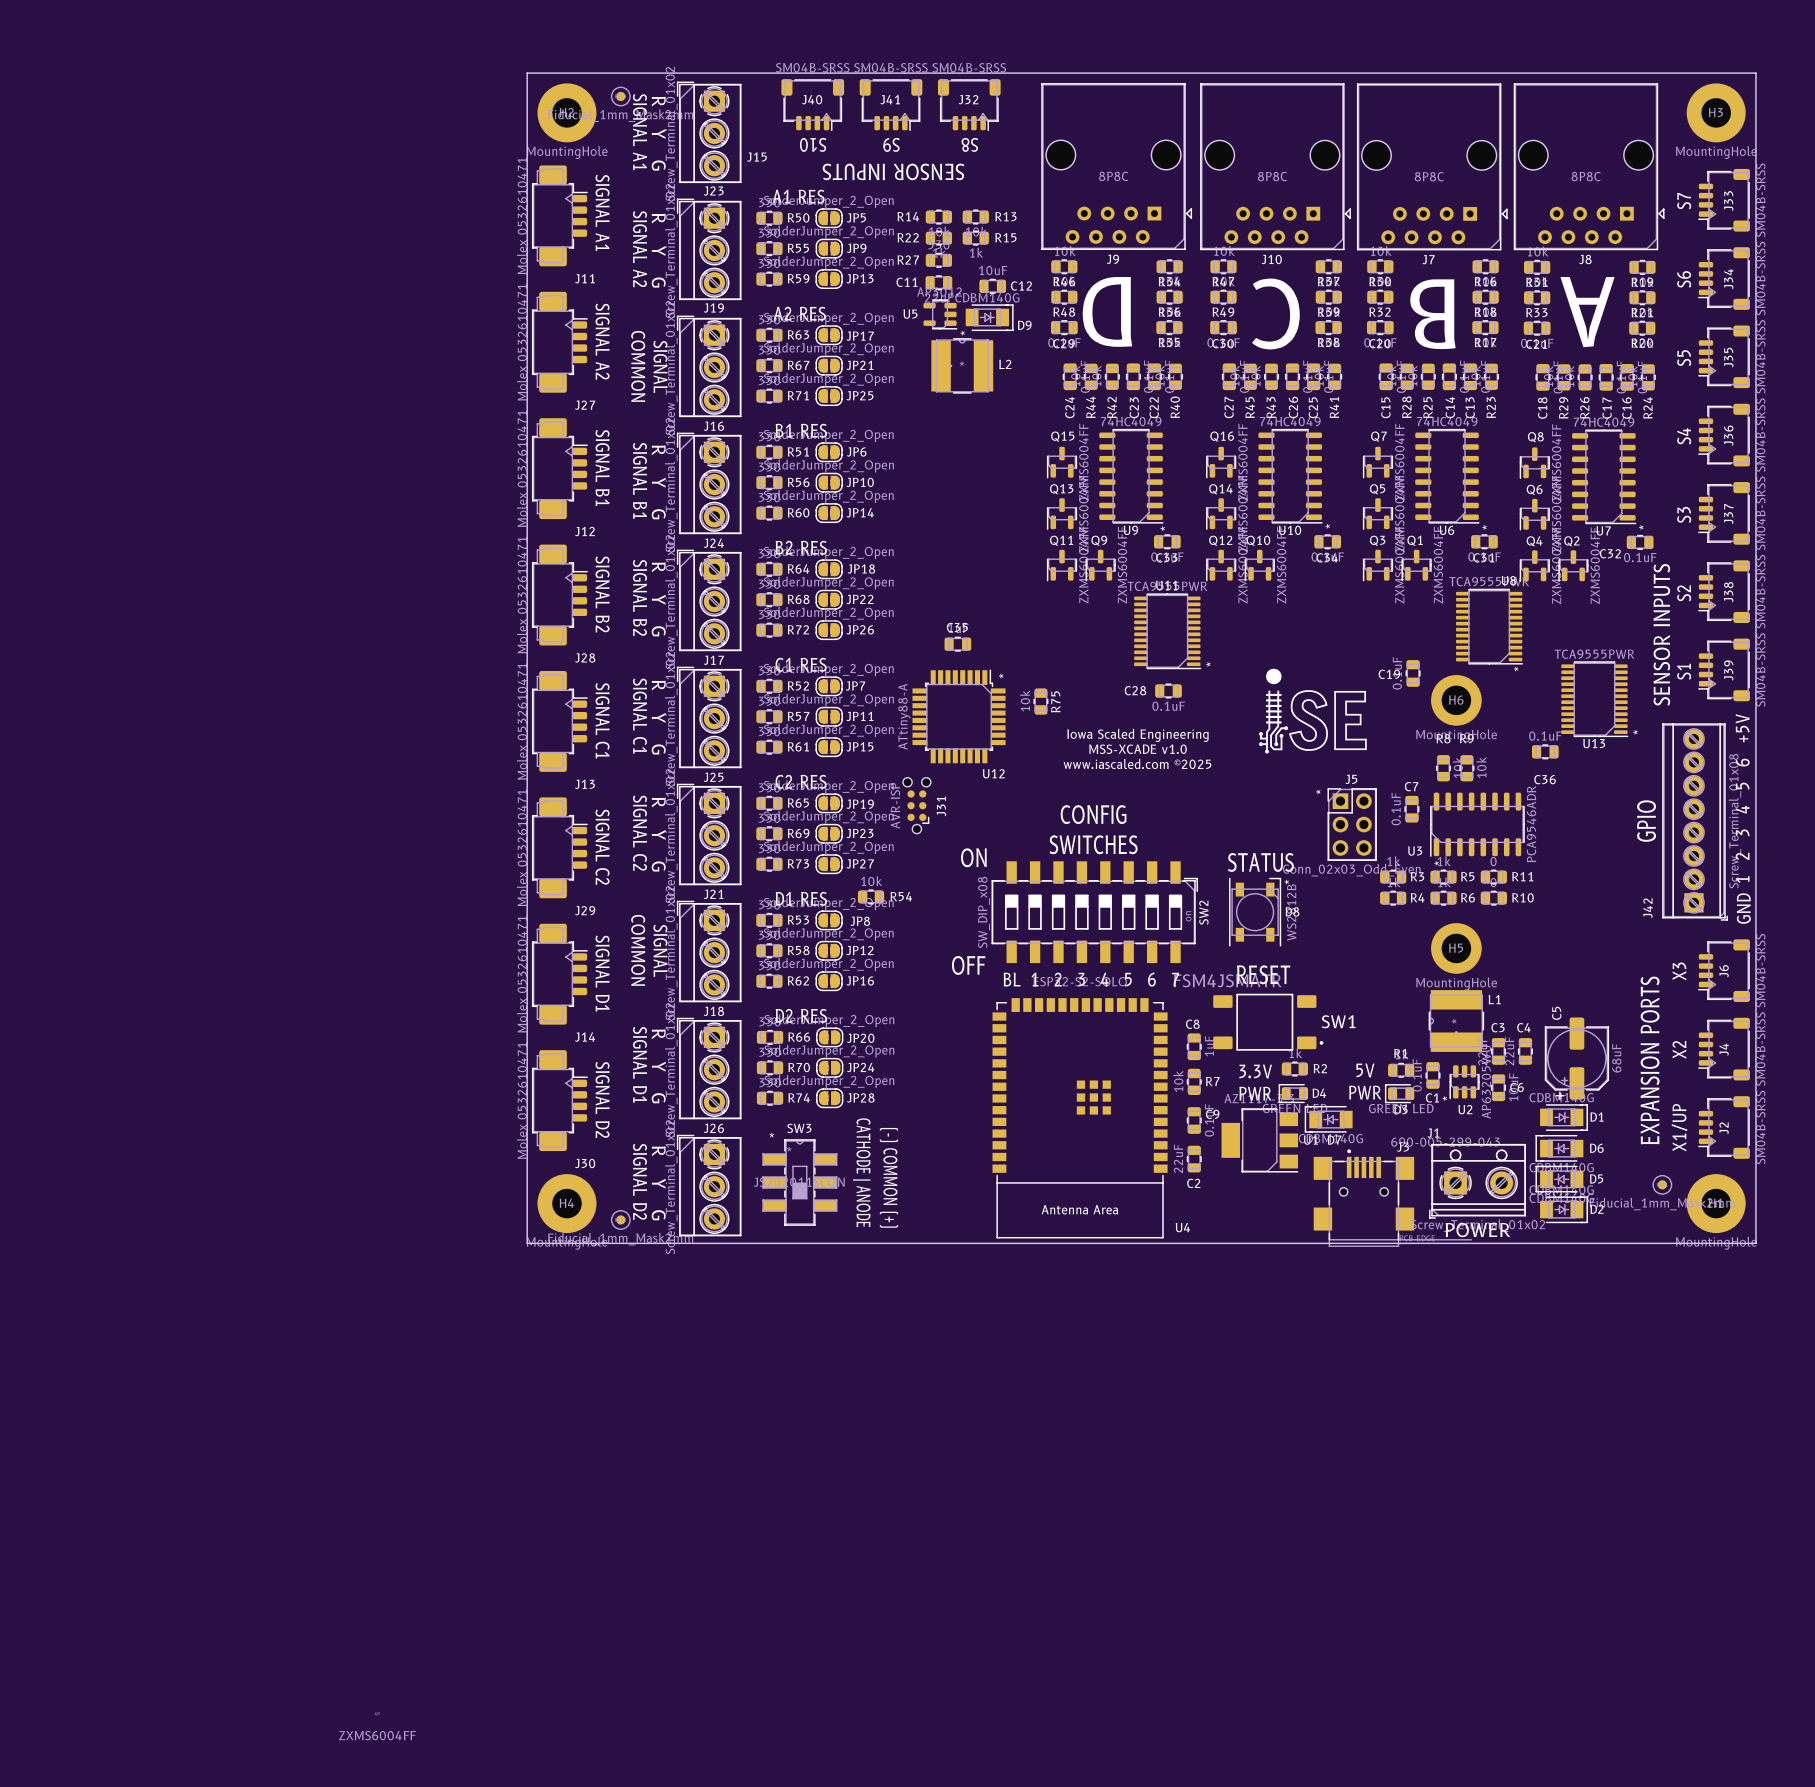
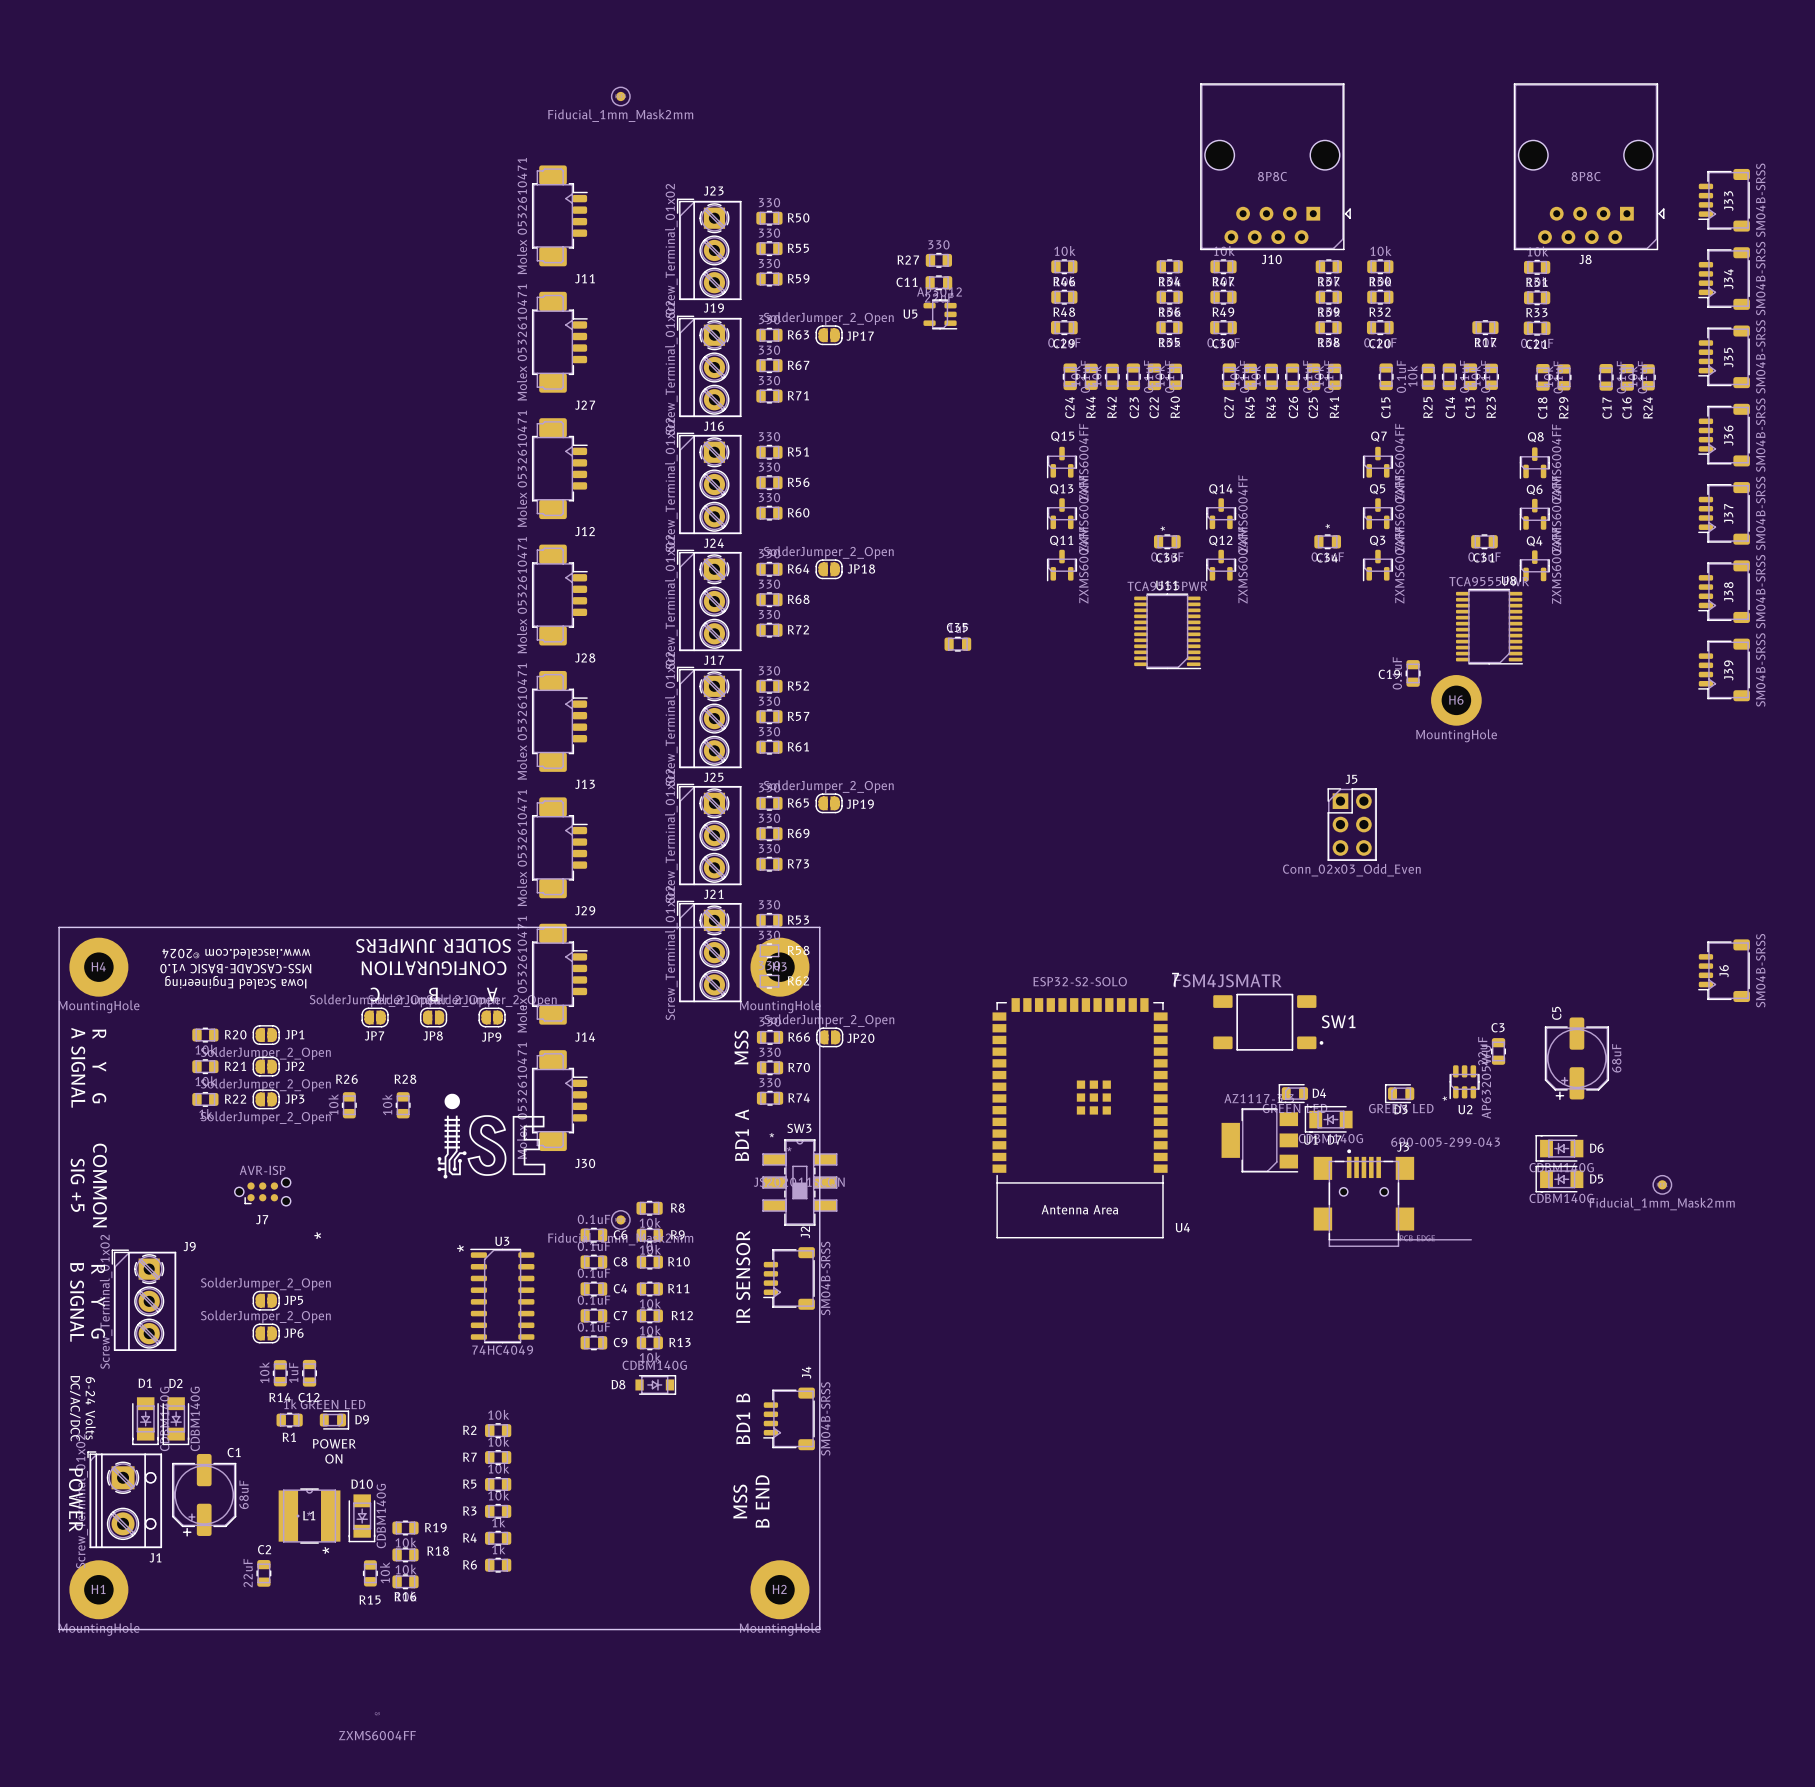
board edge: (527, 73) (1755, 73) (1755, 1243) (527, 1243) (527, 73) -> none
J9 footprint: [1041, 83, 1192, 250] -> [111, 1249, 177, 1351]
J7 footprint: [1357, 83, 1508, 251] -> [234, 1177, 291, 1206]
text: R (658, 101) -> none
J40: SM04B-SRSS (812, 104) -> none
J41: SM04B-SRSS (891, 104) -> none
J32: SM04B-SRSS (969, 104) -> none
H2 position: (566, 112) -> (779, 1589)
H3 position: (1716, 112) -> (779, 967)
text: SIGNAL A1 (639, 132) -> none
J15: Screw_Terminal_01x02 (709, 132) -> none
text: Y (658, 133) -> none
text: S10 (813, 144) -> none
text: S9 (891, 144) -> none
text: S8 (969, 144) -> none
text: G (658, 165) -> none
text: SENSOR INPUTS (893, 171) -> none
J9 value: 8P8C (1113, 176) -> Screw_Terminal_01x02 (106, 1301)
J7 value: 8P8C (1429, 176) -> AVR-ISP (262, 1170)
text: A1 RES (798, 196) -> none
text: S7 (1684, 201) -> none
text: SIGNAL A1 (602, 212) -> none
R14 name position: R14 (908, 216) -> R14 (280, 1397)
R14 rotation: 0° (938, 217) -> 90° clockwise (280, 1373)
R14 position: (938, 217) -> (280, 1373)
R13 position: (975, 217) -> (649, 1342)
text: R (658, 218) -> none
JP5 position: (829, 218) -> (266, 1300)
R22 name position: R22 (908, 237) -> R22 (235, 1099)
R22 position: (938, 238) -> (205, 1099)
R15 rotation: 0° (975, 238) -> 90° clockwise (370, 1573)
R15 position: (975, 238) -> (370, 1573)
JP9 position: (829, 248) -> (492, 1017)
JP9 name position: JP9 (856, 248) -> JP9 (491, 1037)
text: SIGNAL A2 (639, 249) -> none
text: Y (658, 250) -> none
R15 value: 1k (976, 252) -> 10k (384, 1572)
J9 name position: J9 (1112, 259) -> J9 (189, 1246)
J7 name position: J7 (1428, 259) -> J7 (262, 1219)
R16 position: (1485, 266) -> (405, 1581)
R19 position: (1642, 267) -> (405, 1527)
C12 value: 10uF (993, 270) -> 1uF (293, 1372)
JP13: SolderJumper_2_Open (829, 279) -> none
text: S6 (1684, 279) -> none
text: G (658, 282) -> none
R19 name position: R19 (1642, 282) -> R19 (435, 1527)
C12 rotation: 0° (992, 286) -> 90° clockwise (309, 1373)
C12 position: (992, 286) -> (309, 1373)
D9 value: CDBM140G (987, 297) -> GREEN LED (333, 1404)
R18 position: (1485, 297) -> (405, 1554)
R21 position: (1642, 297) -> (205, 1066)
D9 footprint: [965, 304, 1014, 331] -> [319, 1410, 350, 1430]
text: D (1107, 311) -> none
R18 name position: R18 (1485, 312) -> R18 (438, 1551)
text: A (1587, 312) -> none
R21 name position: R21 (1642, 312) -> R21 (235, 1066)
text: A2 RES (799, 313) -> none
text: C (1275, 313) -> none
text: B (1432, 314) -> none
R20 position: (1642, 328) -> (205, 1035)
text: * (962, 333) -> none
text: SIGNAL A2 (602, 341) -> none
R20 name position: R20 (1642, 343) -> R20 (235, 1034)
text: S5 (1684, 358) -> none
JP21: SolderJumper_2_Open (829, 365) -> none
L2: (962, 365) -> none
text: COMMON (638, 366) -> none
text: SIGNAL (660, 366) -> none
R28 position: (1407, 376) -> (403, 1105)
R26 position: (1585, 377) -> (349, 1105)
JP25: SolderJumper_2_Open (829, 396) -> none
R28 name rotation: 0° (1406, 407) -> 90° clockwise (405, 1079)
R28 name position: R28 (1406, 407) -> R28 (405, 1079)
R26 name rotation: 0° (1584, 407) -> 90° clockwise (346, 1079)
R26 name position: R26 (1584, 407) -> R26 (346, 1079)
text: B1 RES (801, 430) -> none
text: S4 (1684, 436) -> none
text: R (658, 450) -> none
JP6 position: (829, 452) -> (266, 1333)
Q16: ZXMS6004FF (1221, 462) -> none
text: SIGNAL B1 (602, 468) -> none
U9: 74HC4049 (1131, 476) -> none
U10: 74HC4049 (1290, 476) -> none
U6: 74HC4049 (1447, 476) -> none
U7: 74HC4049 (1604, 476) -> none
text: SIGNAL B1 (639, 480) -> none
text: Y (658, 482) -> none
JP10: SolderJumper_2_Open (829, 482) -> none
JP14: SolderJumper_2_Open (829, 513) -> none
text: G (658, 514) -> none
text: S3 (1684, 514) -> none
text: * (1484, 527) -> none
text: * (1641, 527) -> none
C32: 0.1uF (1640, 542) -> none
text: B2 RES (801, 547) -> none
Q9: ZXMS6004FF (1100, 565) -> none
Q10: ZXMS6004FF (1259, 565) -> none
Q1: ZXMS6004FF (1416, 565) -> none
Q2: ZXMS6004FF (1573, 566) -> none
text: R (658, 567) -> none
text: S2 (1684, 593) -> none
text: SIGNAL B2 (602, 594) -> none
text: SIGNAL B2 (639, 597) -> none
text: Y (658, 599) -> none
JP22: SolderJumper_2_Open (829, 599) -> none
JP26: SolderJumper_2_Open (829, 630) -> none
text: G (658, 631) -> none
text: SENSOR INPUTS (1661, 634) -> none
text: C1 RES (801, 664) -> none
text: * (1208, 664) -> none
drawing: [1259, 668, 1367, 754] -> none
text: * (1516, 669) -> none
text: S1 (1684, 671) -> none
text: * (1001, 676) -> none
text: R (658, 685) -> none
JP7 position: (829, 686) -> (375, 1017)
JP7 name position: JP7 (855, 686) -> JP7 (374, 1035)
C28: 0.1uF (1168, 691) -> none
U13: TCA9555PWR (1594, 699) -> none
R75: 10k (1040, 701) -> none
text: SIGNAL C1 (639, 716) -> none
JP11: SolderJumper_2_Open (829, 716) -> none
U12: ATtiny88-A (959, 716) -> none
text: Y (658, 717) -> none
text: SIGNAL C1 (602, 720) -> none
text: +5V (1742, 728) -> none
text: * (1635, 732) -> none
text: Iowa Scaled Engineering (1137, 735) -> none
JP15: SolderJumper_2_Open (829, 747) -> none
text: G (658, 749) -> none
text: MSS-XCADE v1.0 (1138, 749) -> none
C36: 0.1uF (1545, 751) -> none
text: 6 (1742, 762) -> none
text: www.iascaled.com ©2025 (1137, 763) -> none
R8 rotation: 0° (1443, 768) -> 90° clockwise (649, 1208)
R8 position: (1443, 768) -> (649, 1208)
R9 rotation: 0° (1466, 768) -> 90° clockwise (649, 1235)
R9 position: (1466, 768) -> (649, 1235)
text: C2 RES (801, 781) -> none
text: 5 (1742, 785) -> none
text: * (1318, 791) -> none
U3 footprint: [1430, 792, 1525, 857] -> [470, 1248, 535, 1344]
text: R (658, 802) -> none
J31: AVR-ISP (916, 805) -> none
C7 rotation: 0° (1411, 809) -> 90° clockwise (593, 1315)
C7 position: (1411, 809) -> (593, 1315)
text: 4 (1742, 809) -> none
text: CONFIG (1093, 814) -> none
text: GPIO (1646, 821) -> none
J42: Screw_Terminal_01x08 (1695, 822) -> none
U3 value: PCA9546ADR (1531, 824) -> 74HC4049 (502, 1350)
text: 3 (1742, 832) -> none
text: SIGNAL C2 (639, 833) -> none
JP23: SolderJumper_2_Open (829, 833) -> none
text: Y (658, 834) -> none
text: SWITCHES (1093, 844) -> none
text: SIGNAL C2 (602, 847) -> none
U3 name position: U3 (1415, 851) -> U3 (502, 1241)
text: 2 (1742, 856) -> none
text: ON (973, 857) -> none
R3 value: 1k (1393, 861) -> 10k (498, 1495)
R5 value: 1k (1444, 861) -> 10k (498, 1468)
R11 value: 0 (1493, 861) -> 10k (650, 1303)
text: STATUS (1260, 862) -> none
text: * (1436, 863) -> none
JP27: SolderJumper_2_Open (829, 864) -> none
text: G (658, 866) -> none
R3 name position: R3 (1417, 876) -> R3 (469, 1511)
R5 name position: R5 (1467, 876) -> R5 (469, 1484)
D8 footprint: [1229, 877, 1282, 947] -> [635, 1375, 677, 1395]
R3 position: (1393, 877) -> (498, 1511)
R5 position: (1443, 877) -> (498, 1484)
R11 position: (1493, 877) -> (649, 1289)
text: 1 (1742, 879) -> none
text: * (1286, 882) -> none
R54: 10k (871, 896) -> none
R4 name position: R4 (1417, 897) -> R4 (469, 1537)
R6 name position: R6 (1468, 897) -> R6 (470, 1564)
text: D1 RES (801, 898) -> none
R4 position: (1393, 898) -> (498, 1538)
R6 position: (1443, 898) -> (498, 1565)
R10 position: (1493, 898) -> (649, 1262)
text: GND (1743, 908) -> none
D8 name position: D8 (1292, 911) -> D8 (618, 1384)
SW2: SW_DIP_x08 (1094, 912) -> none
D8 value: WS2812B (1291, 912) -> CDBM140G (654, 1365)
JP8 position: (829, 920) -> (433, 1017)
JP8 name position: JP8 (860, 921) -> JP8 (433, 1035)
board edge: none -> (59, 927) (819, 927) (819, 1629) (59, 1629) (59, 927)
text: none -> SOLDER JUMPERS (433, 945)
H5: MountingHole (1456, 948) -> none
text: COMMON (638, 950) -> none
text: SIGNAL (660, 950) -> none
JP12: SolderJumper_2_Open (829, 950) -> none
text: none -> www.iascaled.com ©2024 (236, 953)
text: OFF (968, 965) -> none
text: none -> MSS-CASCADE-BASIC v1.0 (235, 968)
text: none -> CONFIGURATION (434, 968)
text: X3 (1679, 971) -> none
text: SIGNAL D1 (602, 973) -> none
text: RESET (1263, 974) -> none
text: BL (1012, 979) -> none
text: 1 (1034, 979) -> none
text: 2 (1058, 979) -> none
text: 3 (1081, 979) -> none
text: 4 (1104, 979) -> none
text: 5 (1128, 979) -> none
text: 6 (1151, 979) -> none
JP16: SolderJumper_2_Open (829, 981) -> none
text: none -> Iowa Scaled Engineering (235, 982)
text: none -> C (375, 994)
text: none -> B (433, 994)
text: none -> A (492, 994)
L1 name position: L1 (1494, 999) -> L1 (309, 1515)
text: D2 RES (801, 1015) -> none
L1 rotation: 0° (1456, 1021) -> 90° clockwise (309, 1516)
L1 position: (1456, 1021) -> (309, 1516)
text: none -> R (99, 1034)
text: R (658, 1034) -> none
JP1: none -> SolderJumper_2_Open (266, 1035)
C8 rotation: 0° (1194, 1046) -> 90° clockwise (593, 1262)
C8 position: (1194, 1046) -> (593, 1262)
C8 value: 1uF (1209, 1046) -> 0.1uF (594, 1246)
text: none -> MSS (741, 1047)
text: X2 (1679, 1049) -> none
J4 position: (1724, 1049) -> (789, 1418)
J4 name position: J4 (1724, 1049) -> J4 (806, 1372)
C4 value: 22uF (1509, 1051) -> 0.1uF (594, 1273)
C4 rotation: 0° (1525, 1051) -> 90° clockwise (593, 1289)
C4 position: (1525, 1051) -> (593, 1289)
R2 value: 1k (1295, 1053) -> 10k (498, 1414)
R1 name position: R1 (1400, 1053) -> R1 (289, 1437)
text: EXPANSION PORTS (1650, 1060) -> none
C1 footprint: [1425, 1062, 1441, 1089] -> [172, 1453, 237, 1537]
text: SIGNAL D1 (639, 1064) -> none
text: none -> Y (99, 1066)
JP2: none -> SolderJumper_2_Open (266, 1066)
text: Y (658, 1066) -> none
text: none -> A SIGNAL (78, 1067)
JP24: SolderJumper_2_Open (829, 1067) -> none
J18: Screw_Terminal_01x02 (709, 1068) -> none
R2 position: (1294, 1068) -> (498, 1430)
R2 name position: R2 (1320, 1068) -> R2 (469, 1430)
text: 5V (1365, 1070) -> none
R1 position: (1401, 1070) -> (289, 1420)
text: 3.3V (1255, 1071) -> none
C1 value: 0.1uF (1417, 1075) -> 68uF (244, 1494)
R7 rotation: 0° (1194, 1081) -> 90° clockwise (498, 1457)
R7 position: (1194, 1081) -> (498, 1457)
R7 name position: R7 (1212, 1081) -> R7 (469, 1457)
C6 rotation: 0° (1498, 1087) -> 90° clockwise (593, 1235)
C6 position: (1498, 1087) -> (593, 1235)
C6 value: 10uF (1513, 1087) -> 0.1uF (594, 1219)
text: PWR (1365, 1092) -> none
drawing: none -> [437, 1093, 546, 1179]
text: PWR (1255, 1093) -> none
C1 name position: C1 (1432, 1097) -> C1 (234, 1452)
text: none -> G (99, 1098)
text: G (658, 1098) -> none
JP28: SolderJumper_2_Open (829, 1098) -> none
JP3: none -> SolderJumper_2_Open (266, 1099)
text: SIGNAL D2 (602, 1099) -> none
D1 rotation: 0° (1563, 1117) -> 90° clockwise (145, 1421)
D1 position: (1563, 1117) -> (145, 1421)
D1 name position: D1 (1597, 1117) -> D1 (145, 1383)
C9 rotation: 0° (1194, 1120) -> 90° clockwise (593, 1342)
C9 position: (1194, 1120) -> (593, 1342)
C9 value position: 0.1uF (1209, 1120) -> 0.1uF (594, 1327)
text: X1/UP (1679, 1127) -> none
J2 position: (1724, 1127) -> (789, 1278)
J2 name position: J2 (1724, 1128) -> J2 (805, 1232)
J1 name position: J1 (1433, 1133) -> J1 (155, 1557)
text: none -> BD1 A (742, 1135)
text: R (658, 1151) -> none
C2 position: (1194, 1159) -> (263, 1573)
text: CATHODE | ANODE (861, 1172) -> none
text: (-) COMMON (+) (888, 1177) -> none
text: SIGNAL D2 (639, 1181) -> none
J1 rotation: 0° (1477, 1181) -> 90° clockwise (124, 1499)
J1 position: (1477, 1181) -> (124, 1499)
text: Y (658, 1183) -> none
C2 name position: C2 (1193, 1183) -> C2 (264, 1549)
text: none -> SIG +5 (77, 1185)
text: none -> COMMON (99, 1185)
J26: Screw_Terminal_01x02 (709, 1185) -> none
H4 position: (566, 1203) -> (98, 967)
H1 position: (1716, 1203) -> (98, 1589)
D2 rotation: 0° (1563, 1209) -> 90° clockwise (175, 1421)
D2 position: (1563, 1209) -> (175, 1421)
D2 name position: D2 (1597, 1209) -> D2 (175, 1383)
text: G (658, 1215) -> none
text: POWER (1477, 1230) -> none
text: none -> * (317, 1235)
text: none -> * (460, 1248)
text: none -> R (98, 1269)
text: none -> IR SENSOR (743, 1276)
text: none -> Y (98, 1301)
text: none -> B SIGNAL (77, 1302)
R12: none -> 10k (649, 1315)
text: none -> G (98, 1333)
text: none -> DC/AC/DCC (75, 1408)
text: none -> 6-24 Volts (90, 1408)
text: none -> BD1 B (743, 1418)
text: none -> POWER (334, 1443)
text: none -> ON (333, 1458)
text: none -> POWER (75, 1500)
text: none -> MSS (740, 1501)
text: none -> B END (762, 1501)
D10: none -> CDBM140G (361, 1518)
text: none -> * (325, 1550)

